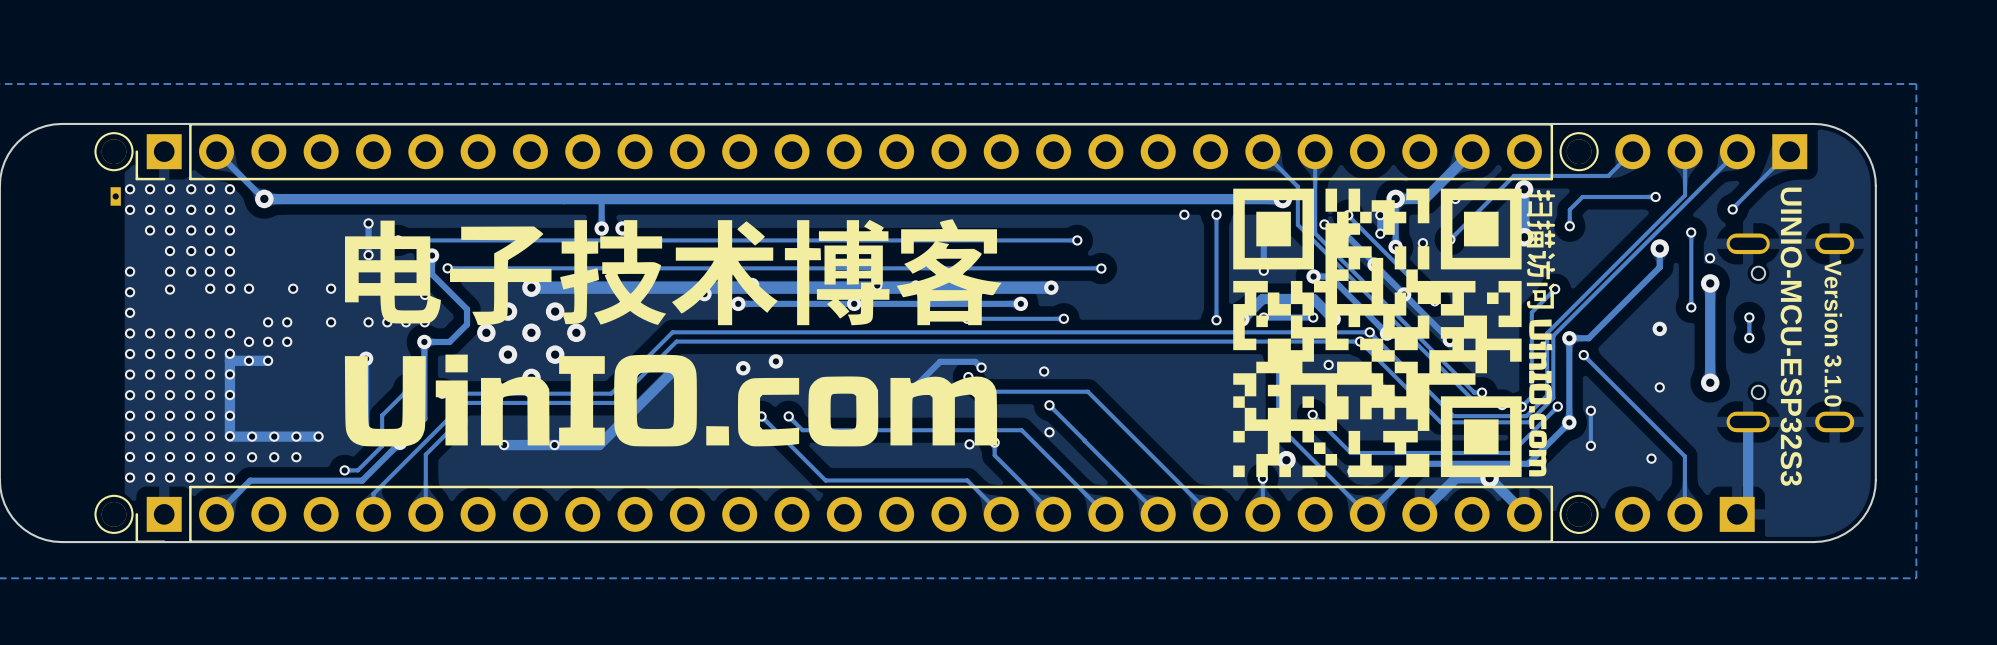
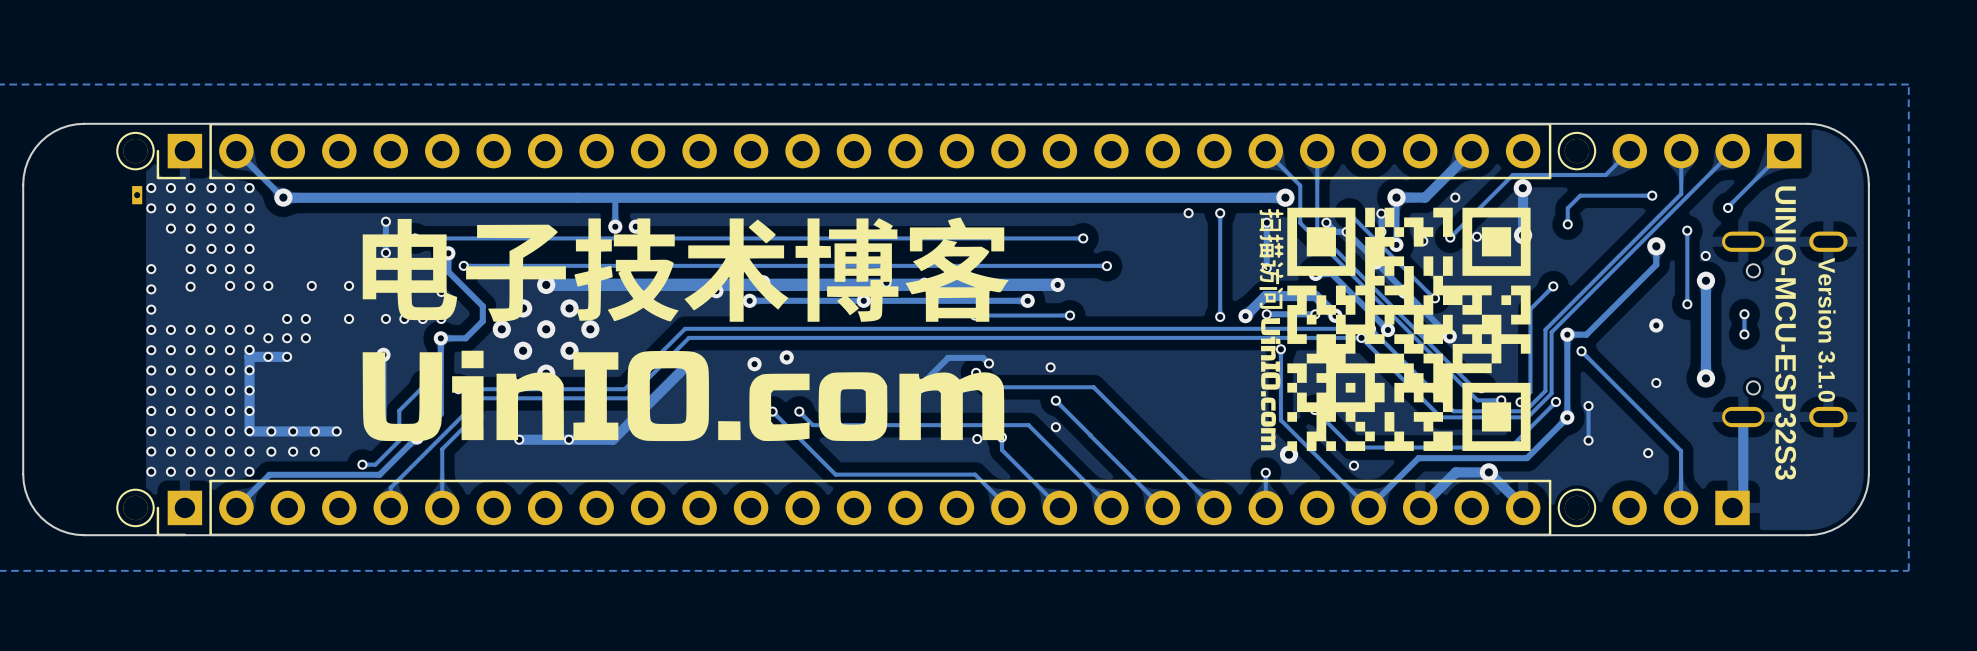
drawing shape: [1233, 188, 1556, 478] -> [1259, 207, 1531, 451]

